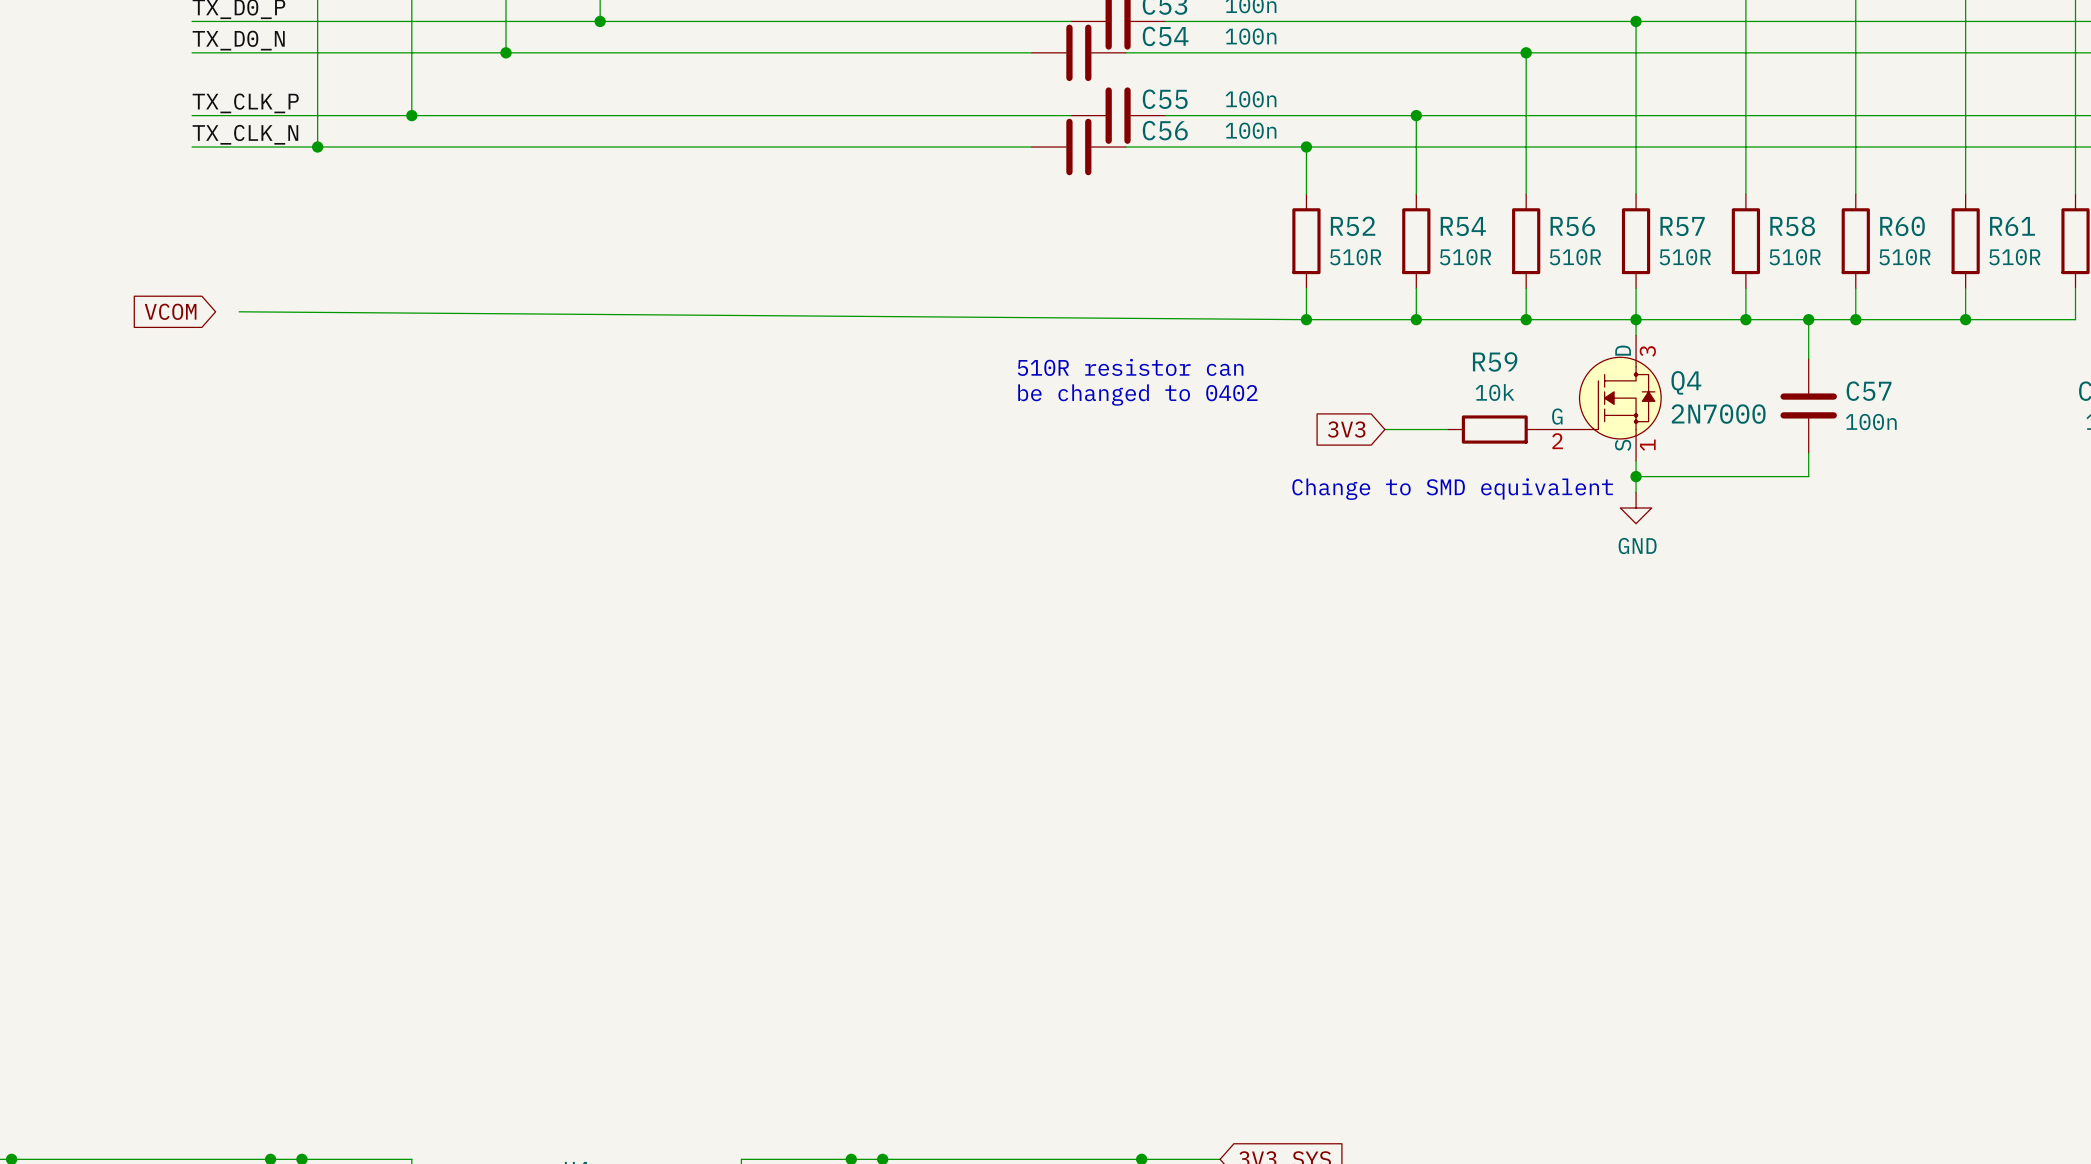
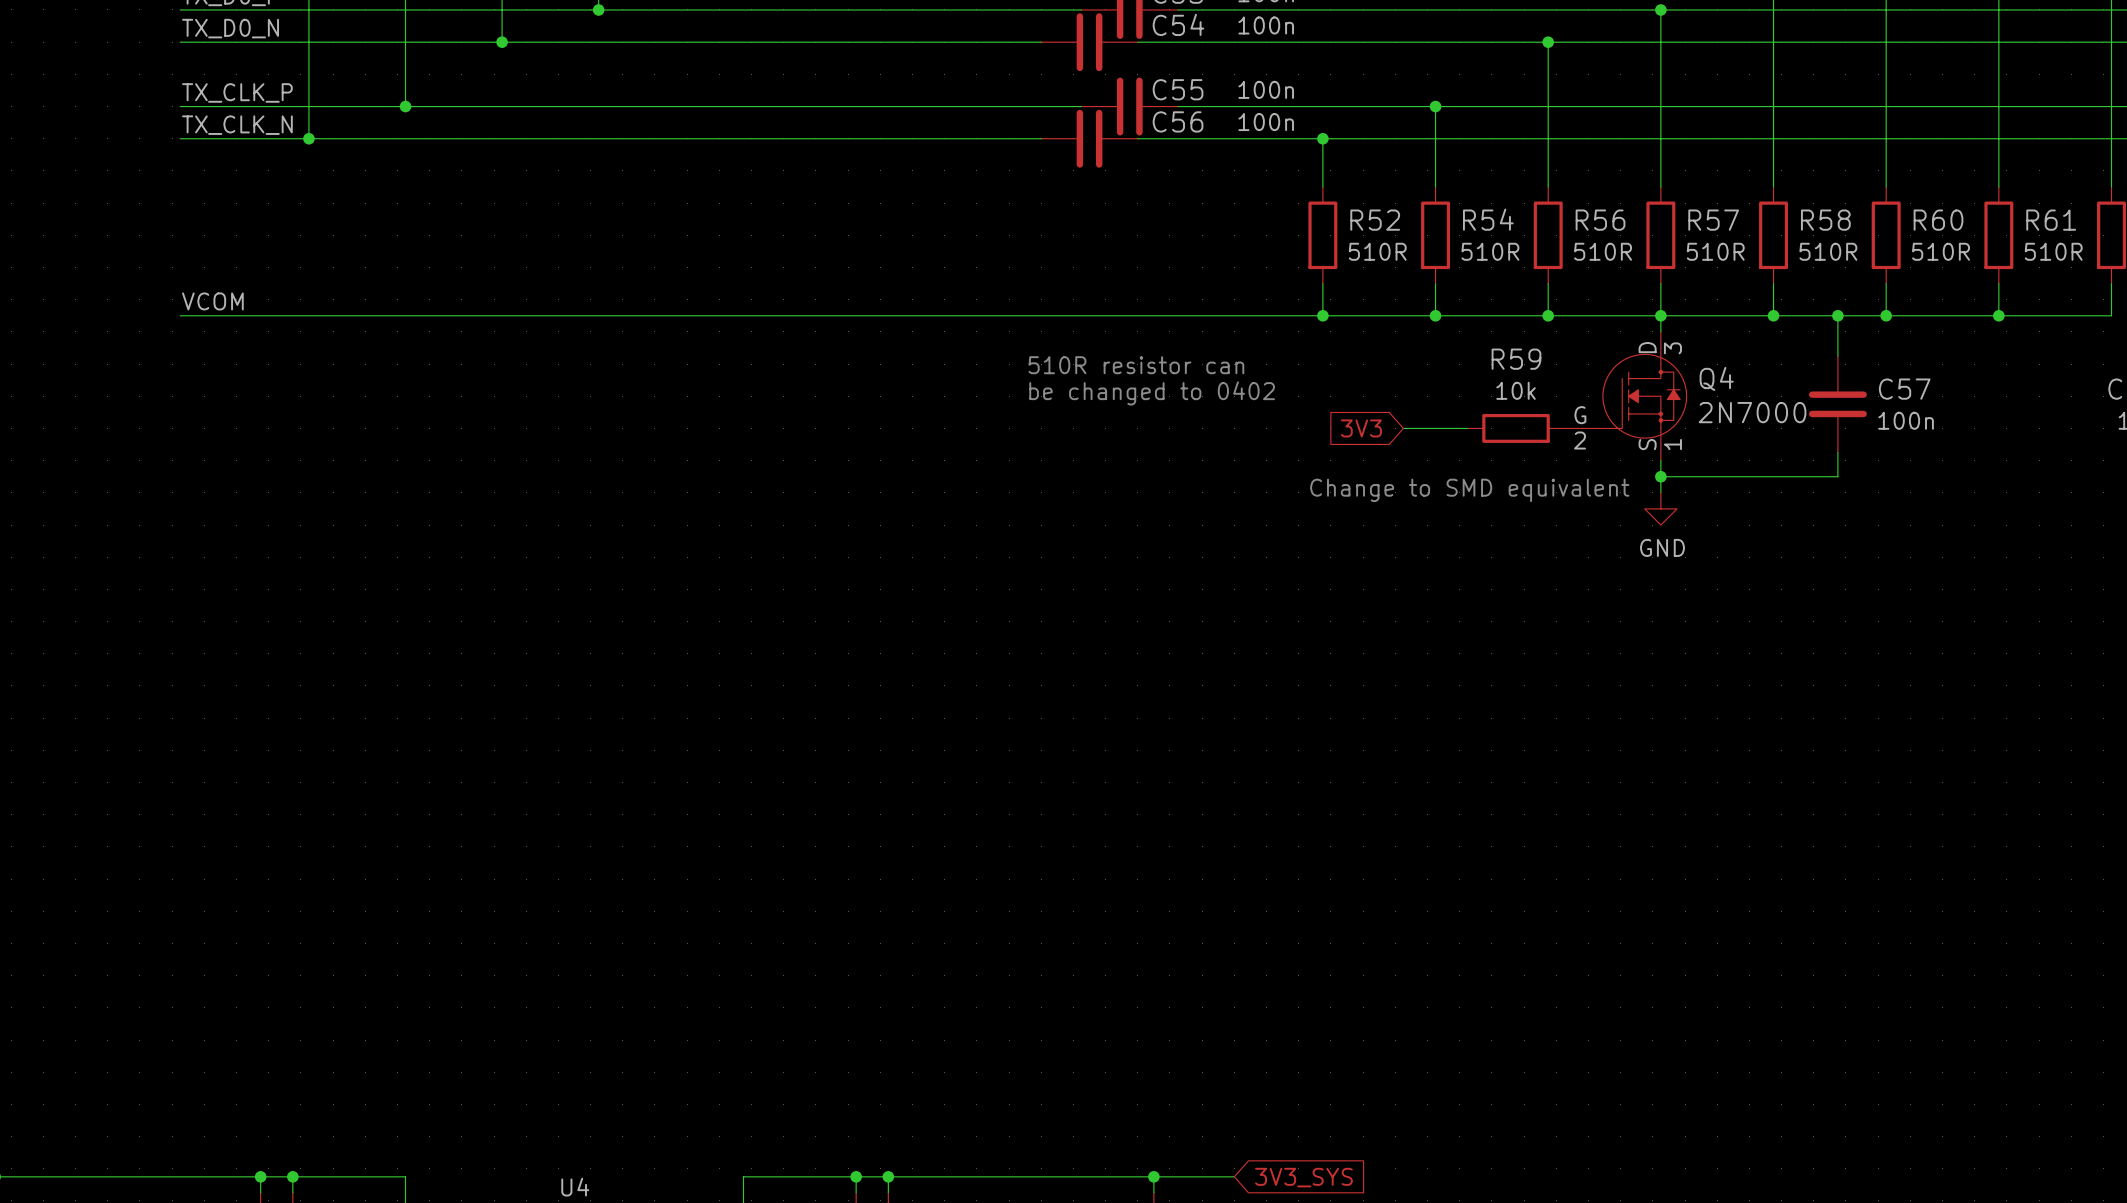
label: none -> VCOM (212, 301)
global label: VCOM (170, 311) -> none
wire: (239, 311) (1306, 319) -> (180, 315) (1322, 315)

